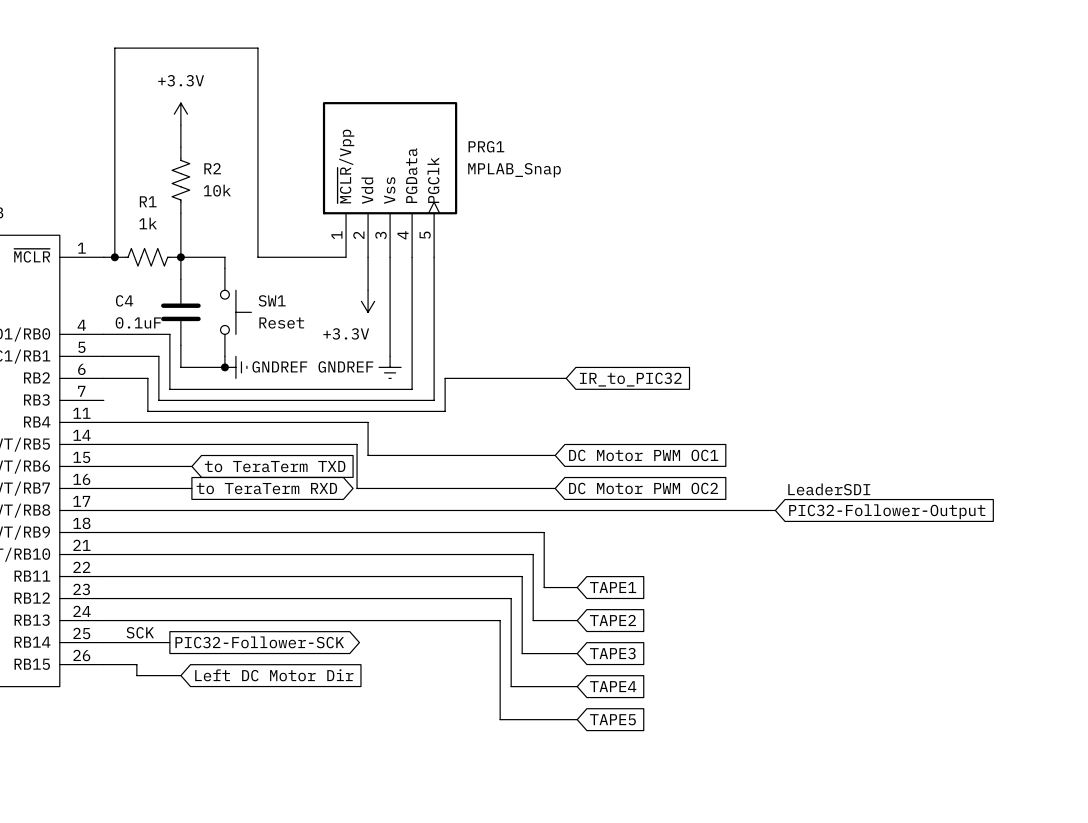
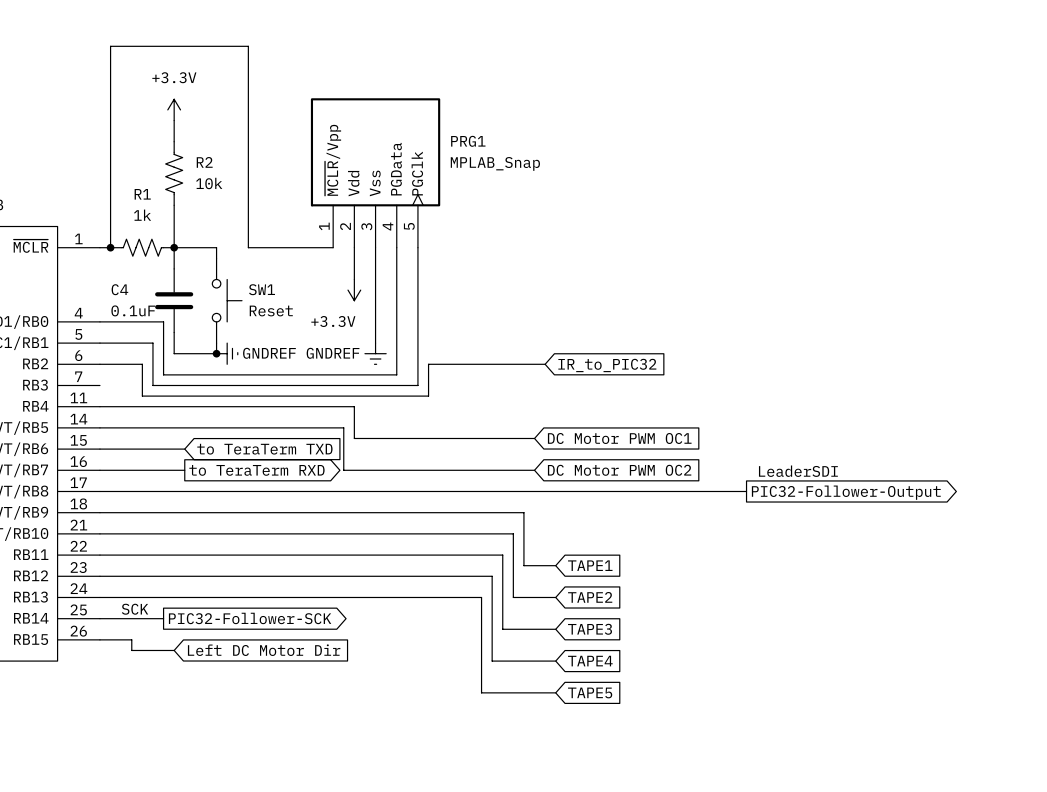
global label shape: input (887, 511) -> output (846, 492)

